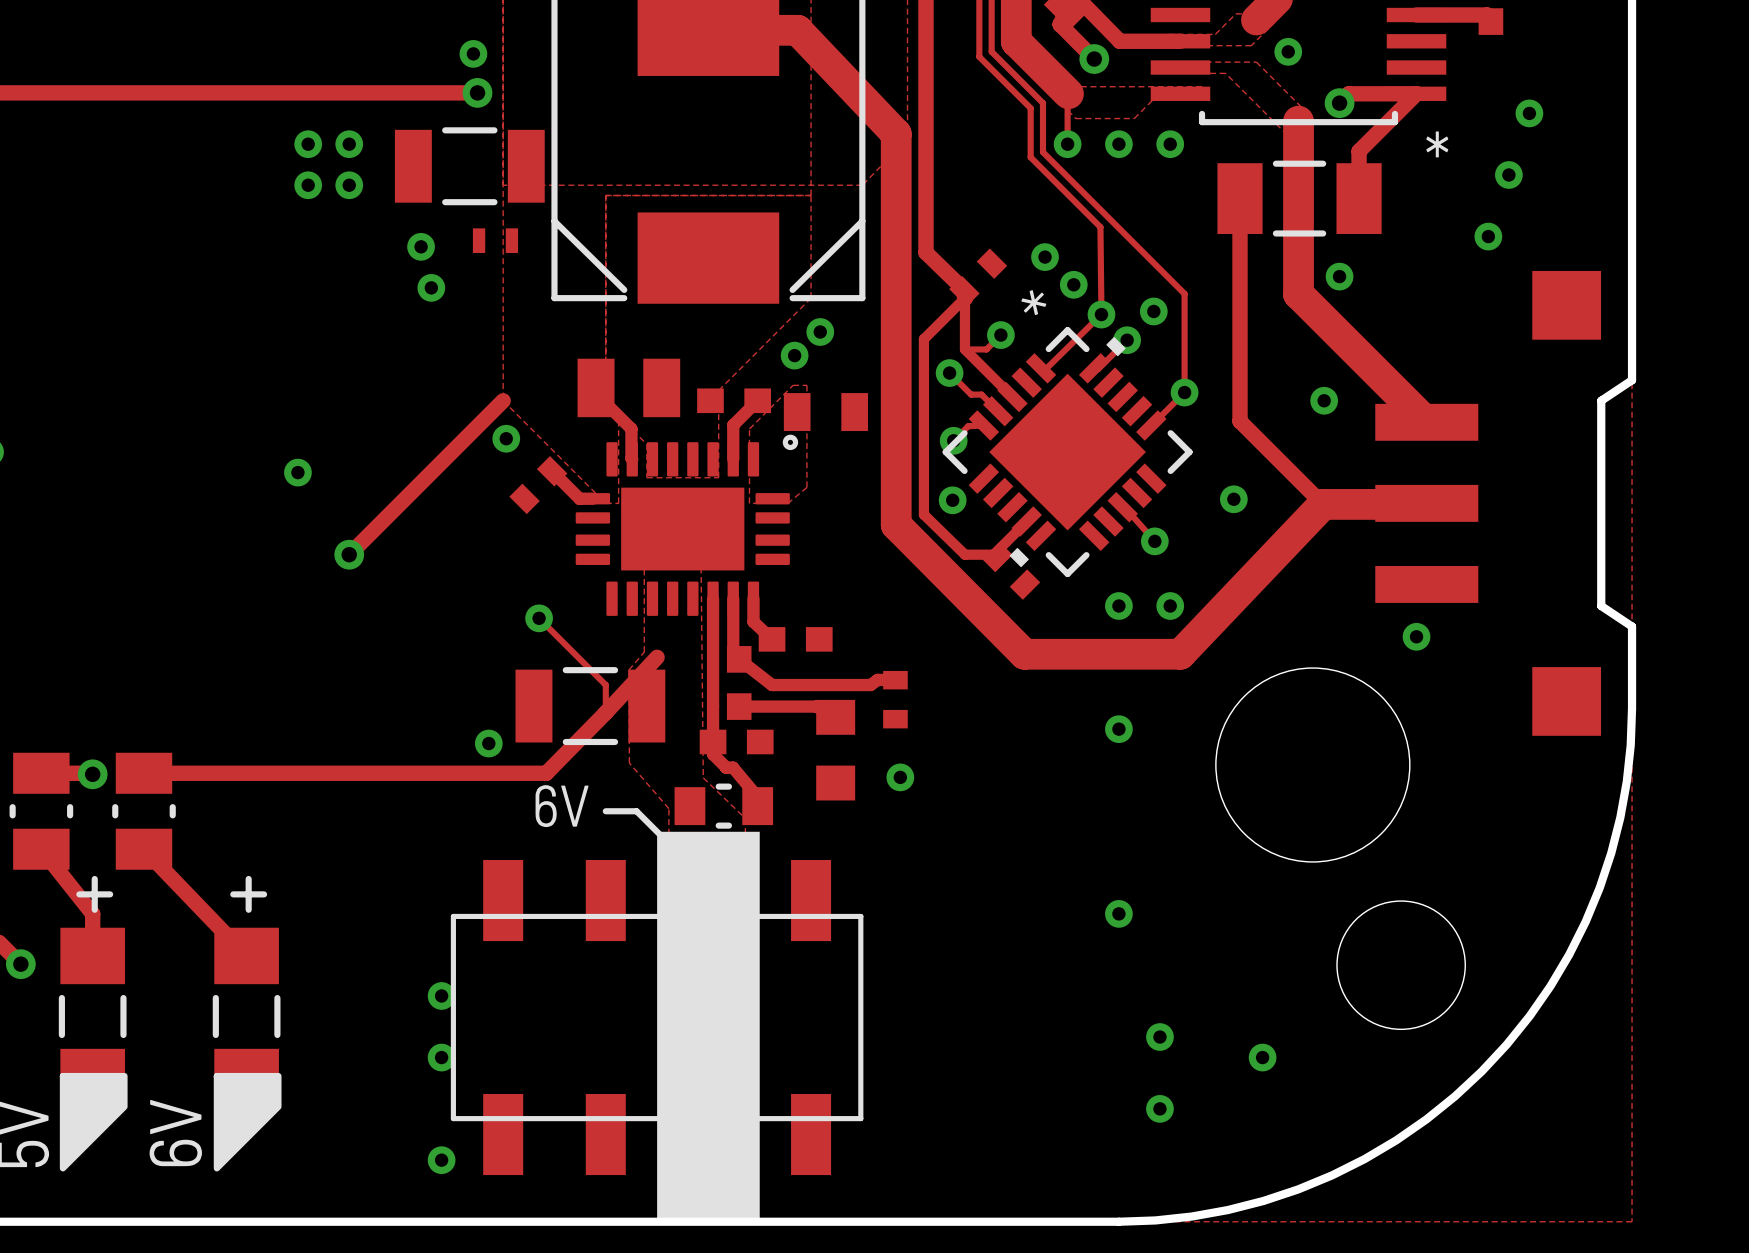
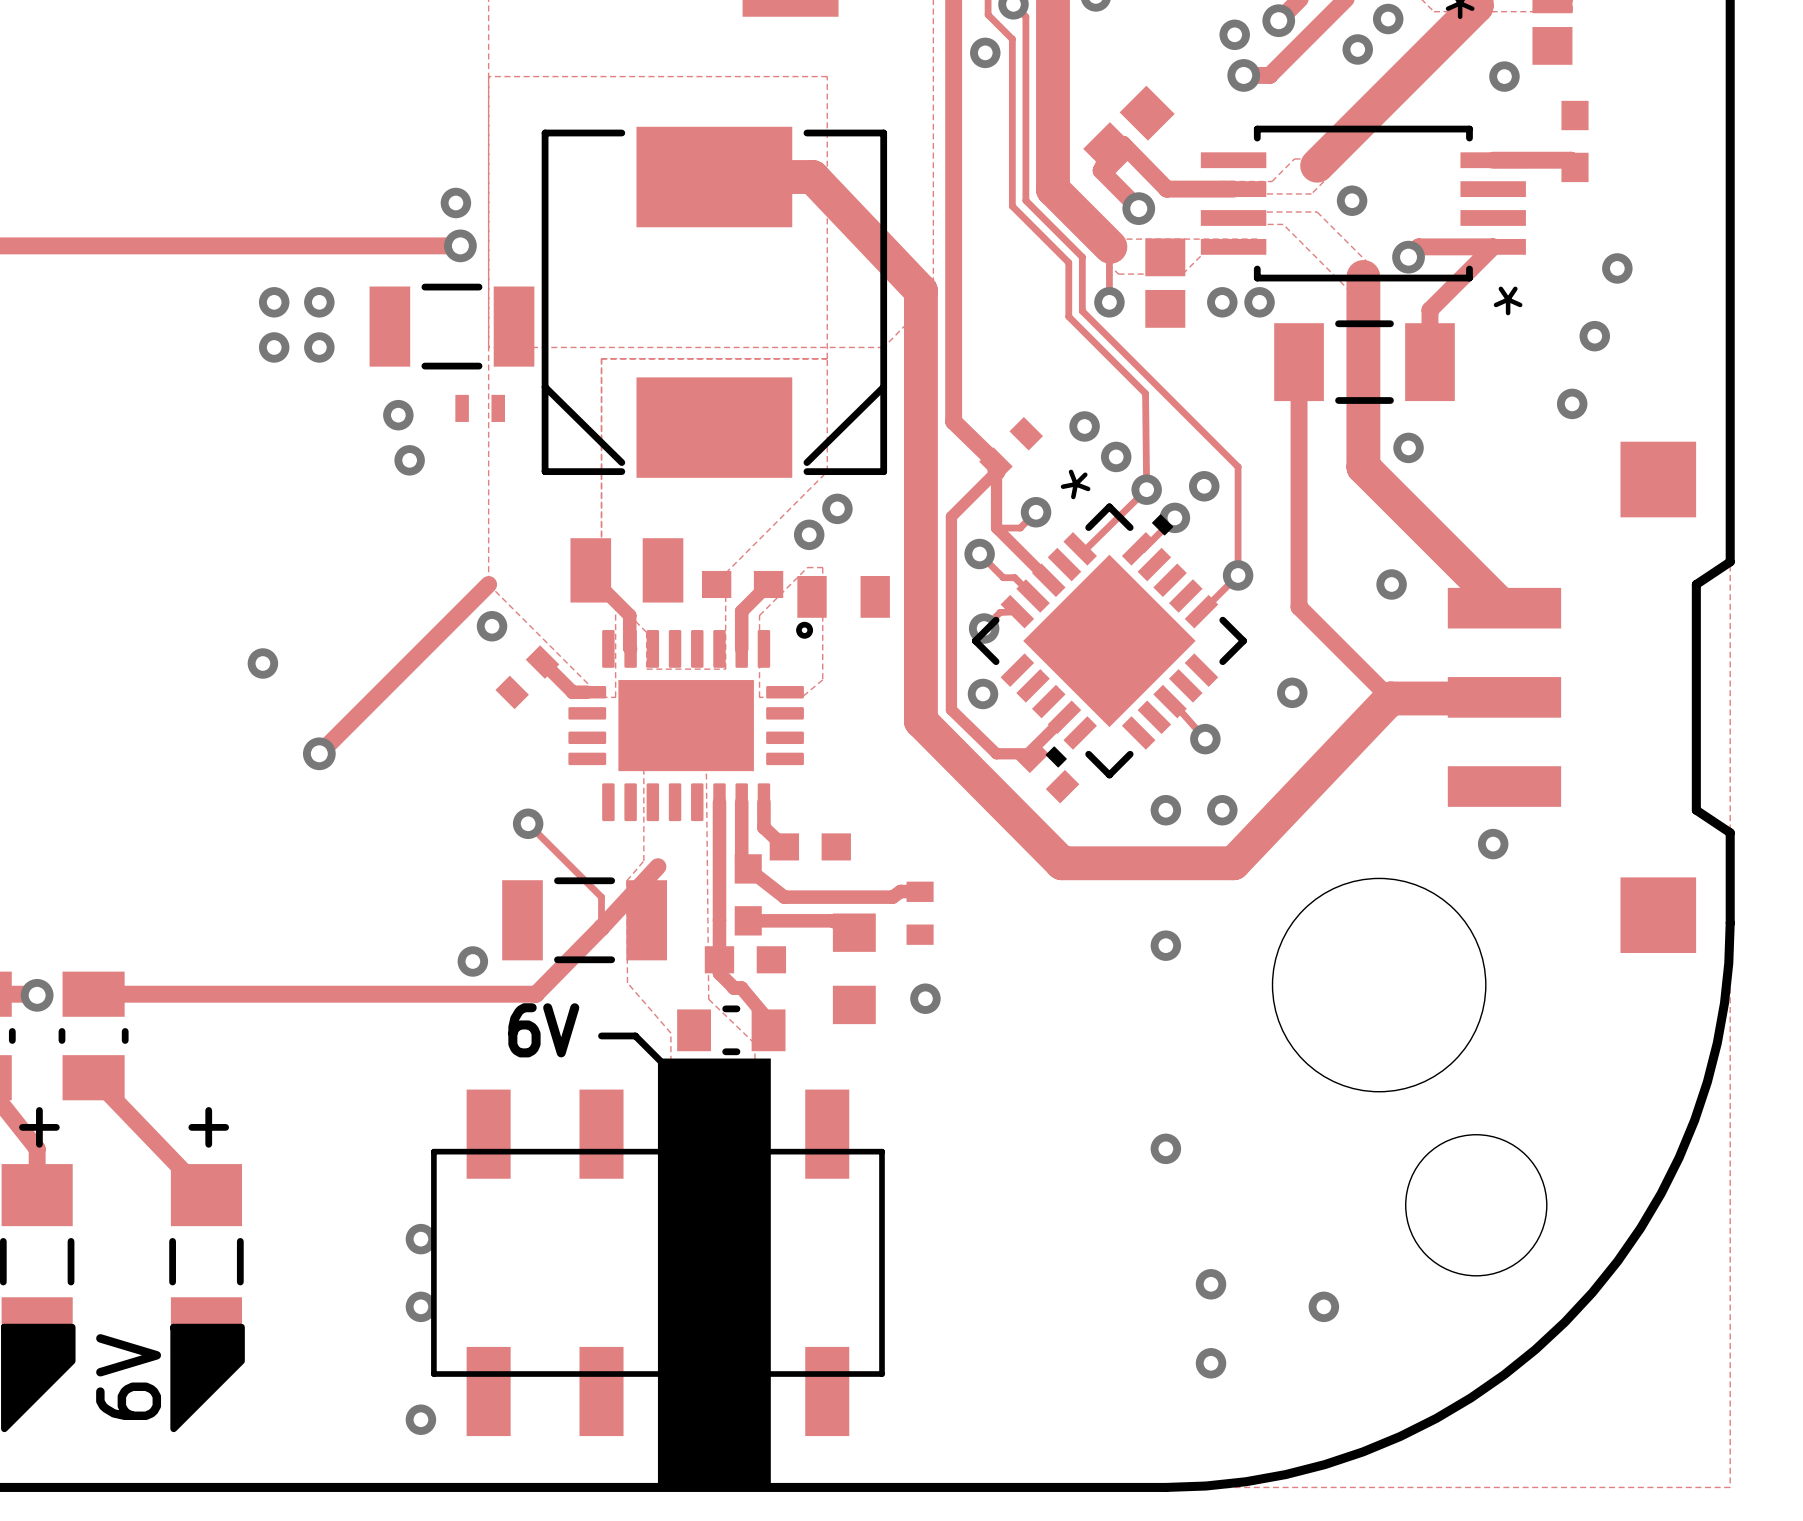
part: none -> (1165, 283)
via position: (1118, 144) -> (1259, 302)

